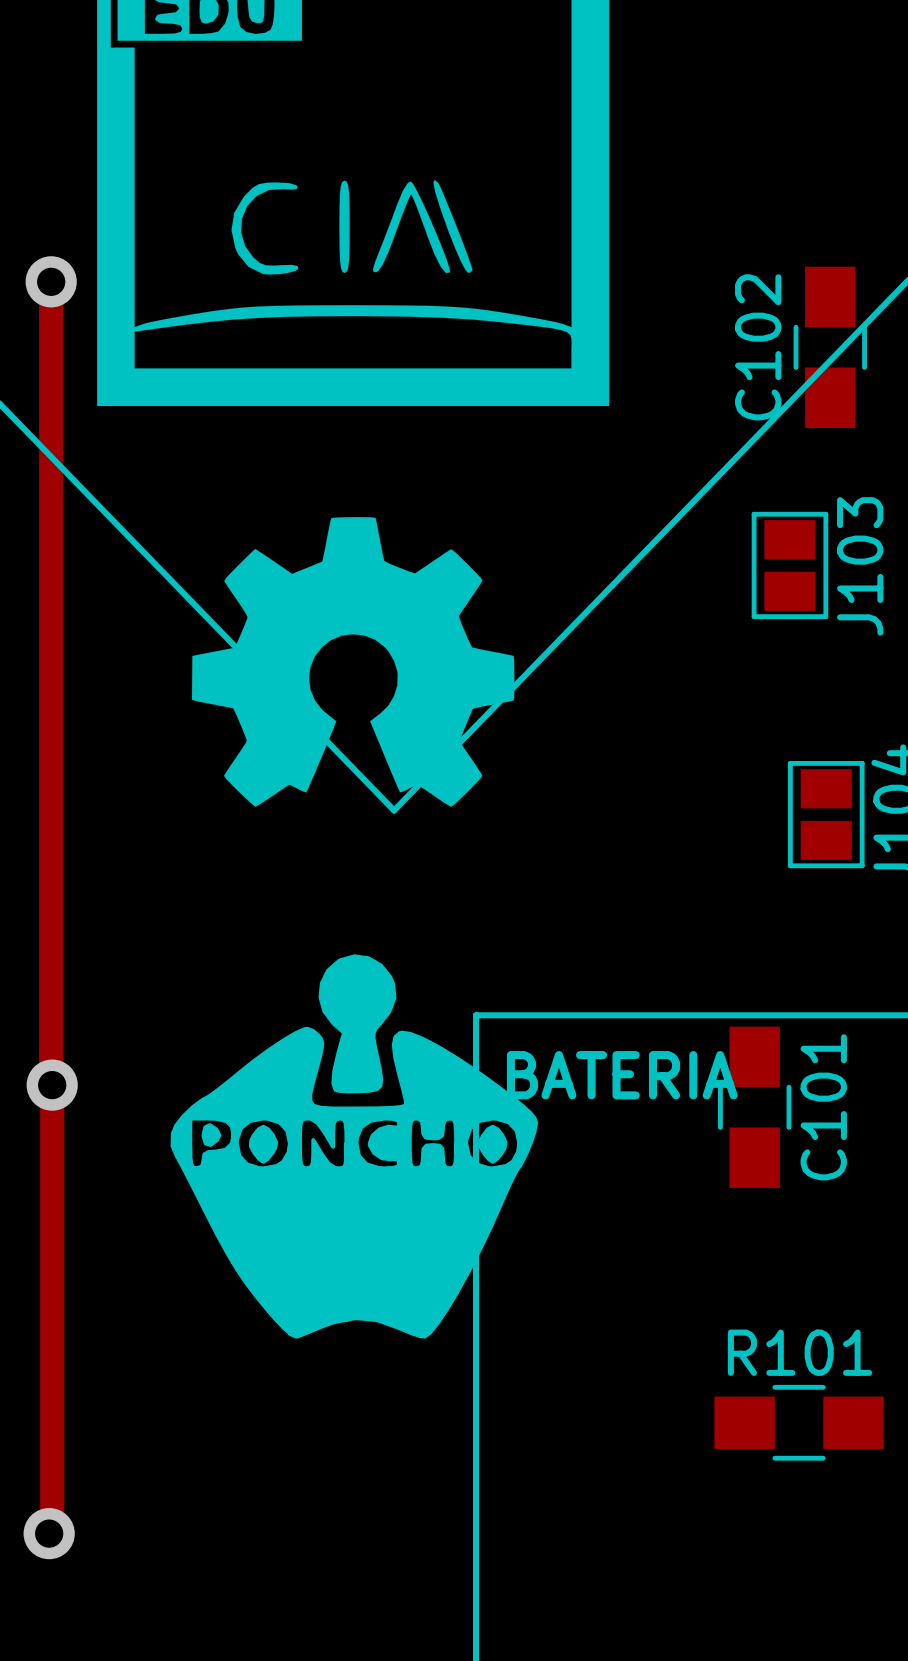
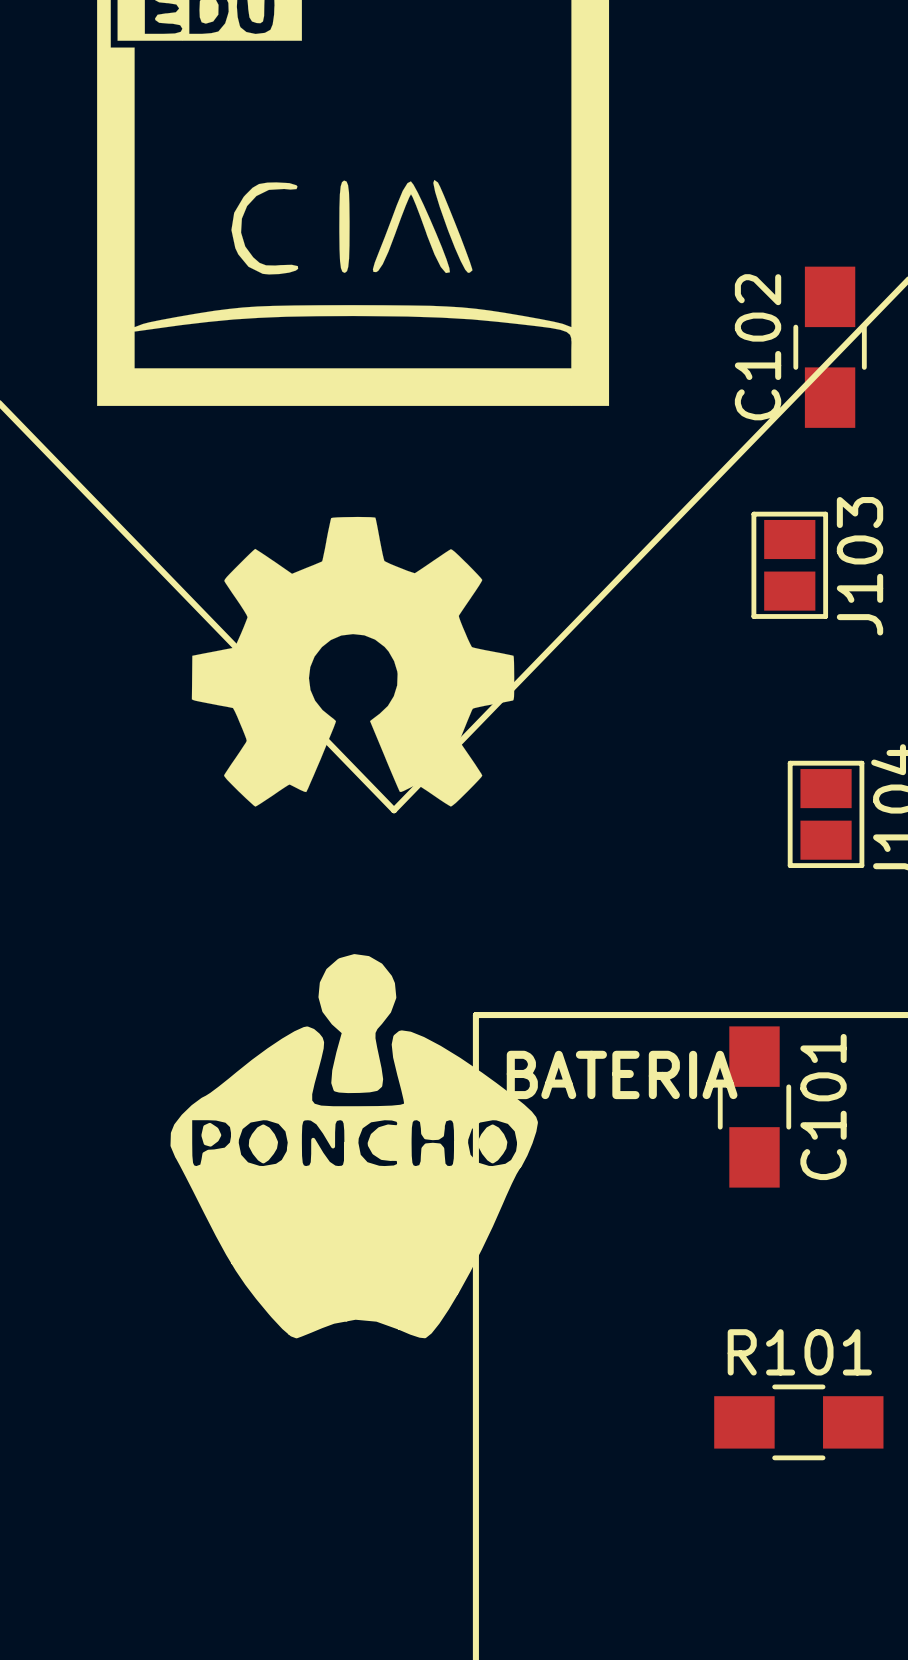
track: (51, 281) (52, 1530) (49, 1533) -> none
via: (51, 281) -> none
via: (52, 1085) -> none
via: (49, 1533) -> none

